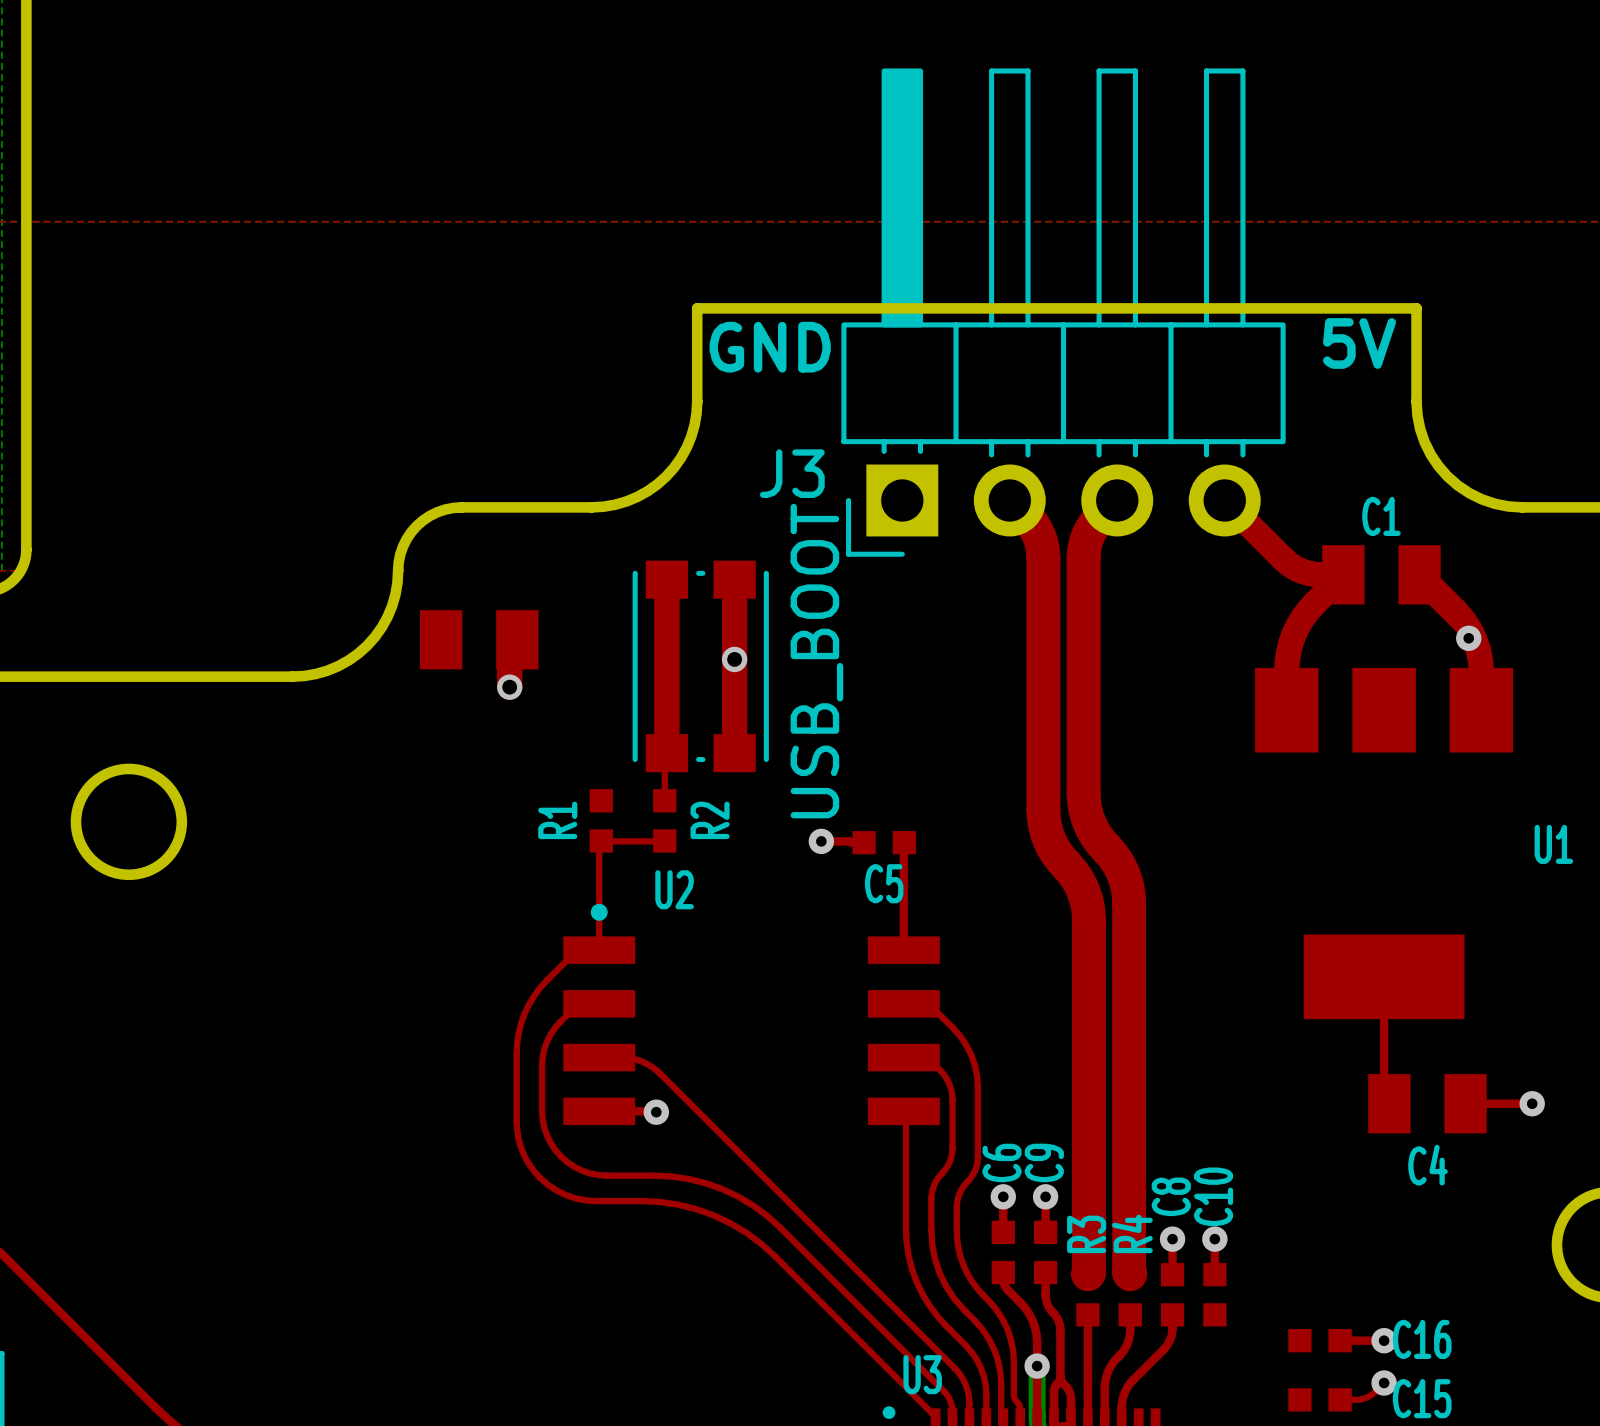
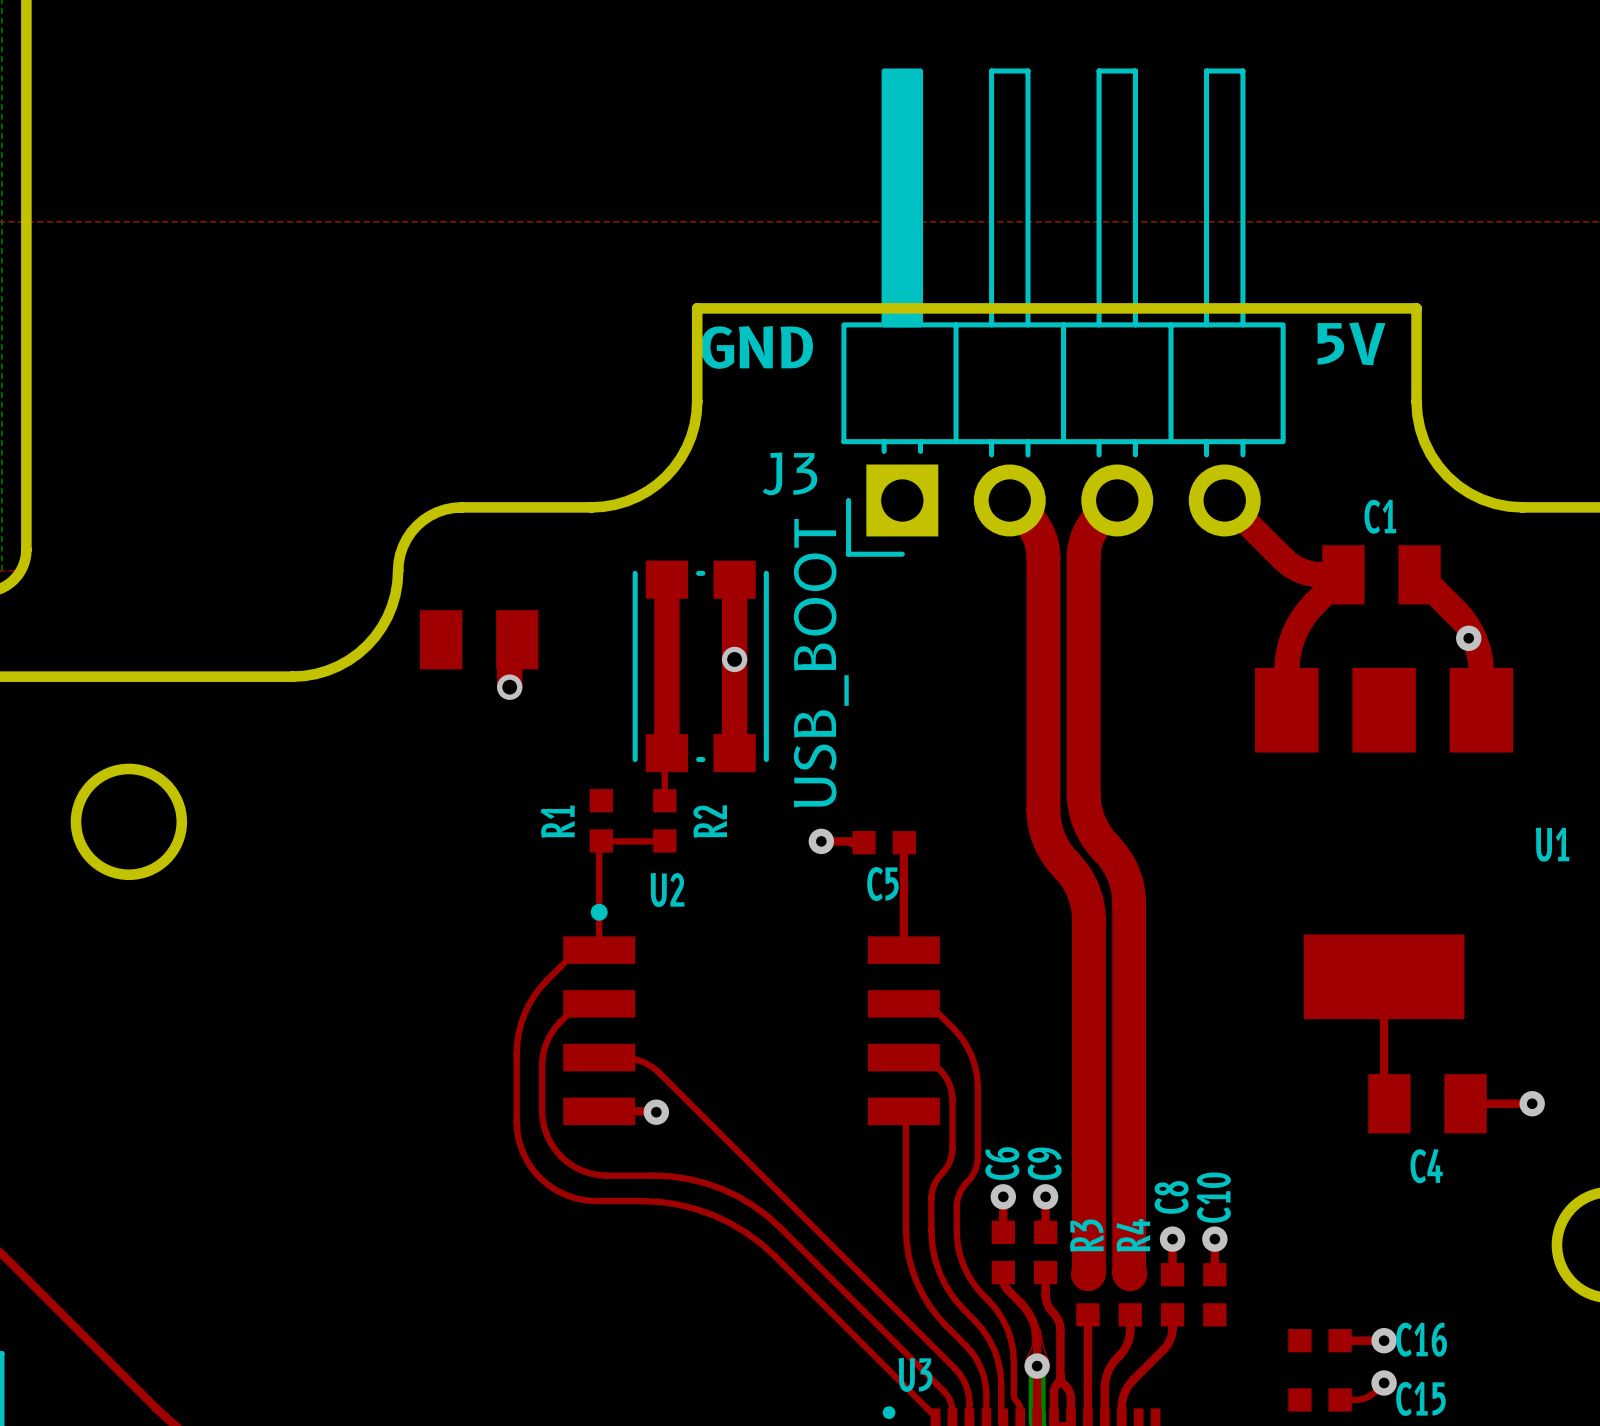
top zone outline: none -> (1039, 1329) (1048, 1360) (1025, 1360) (1032, 1344) (1031, 1331) (1039, 1329)

